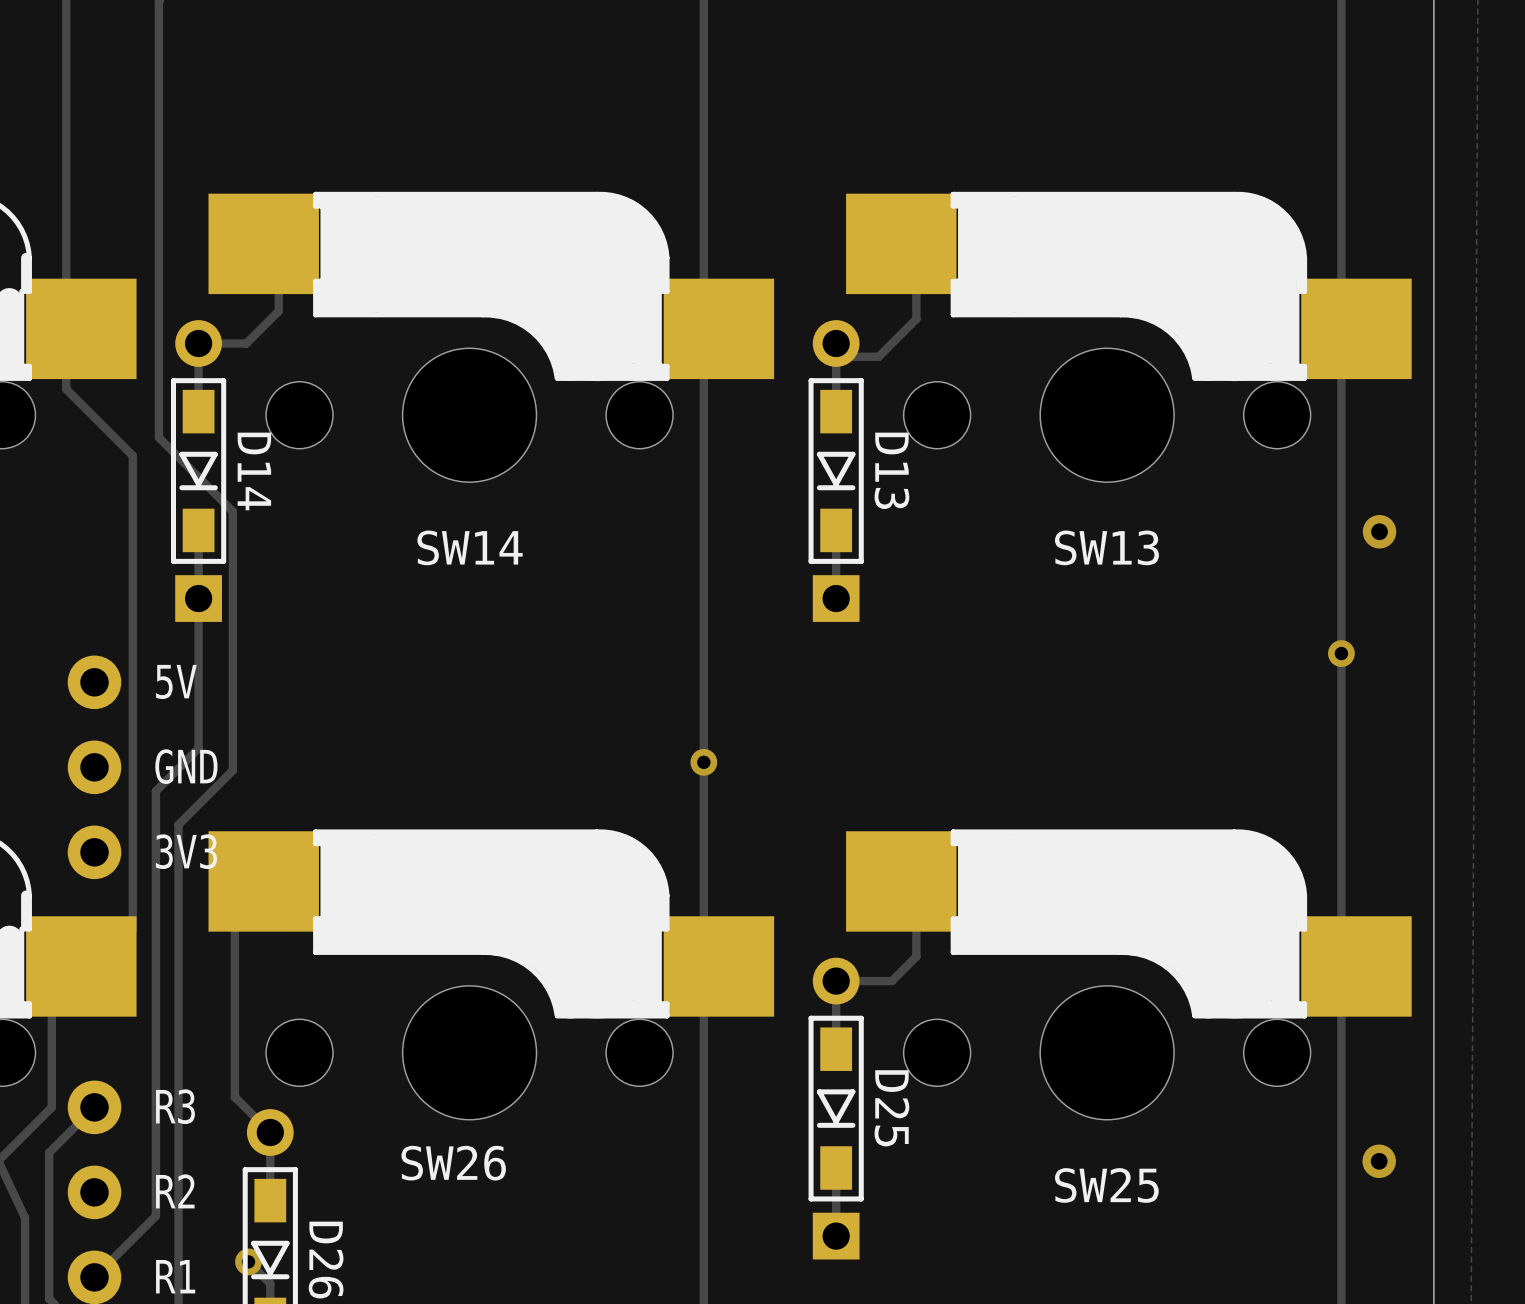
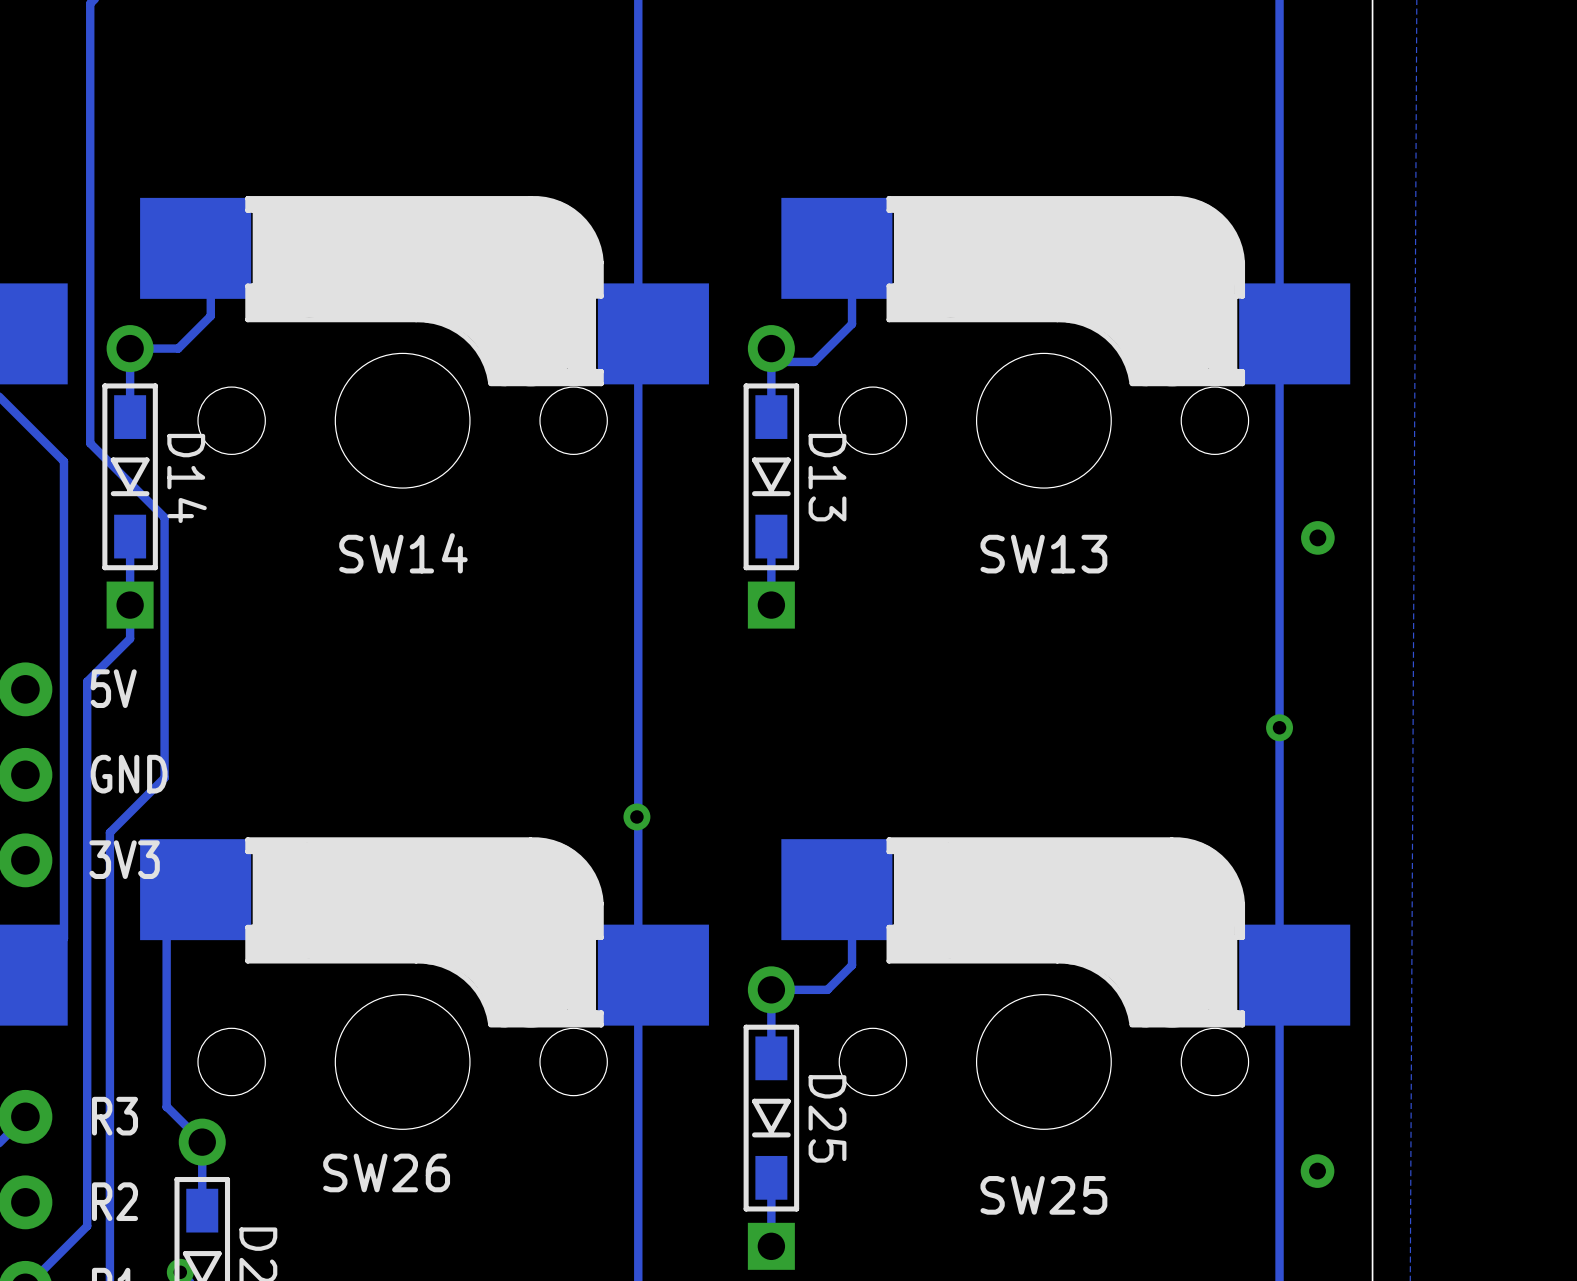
track: (198, 632) (198, 748) (155, 791) -> (130, 638) (87, 681) (87, 798)
via position: (1341, 653) -> (1279, 727)
via position: (703, 762) -> (636, 816)

